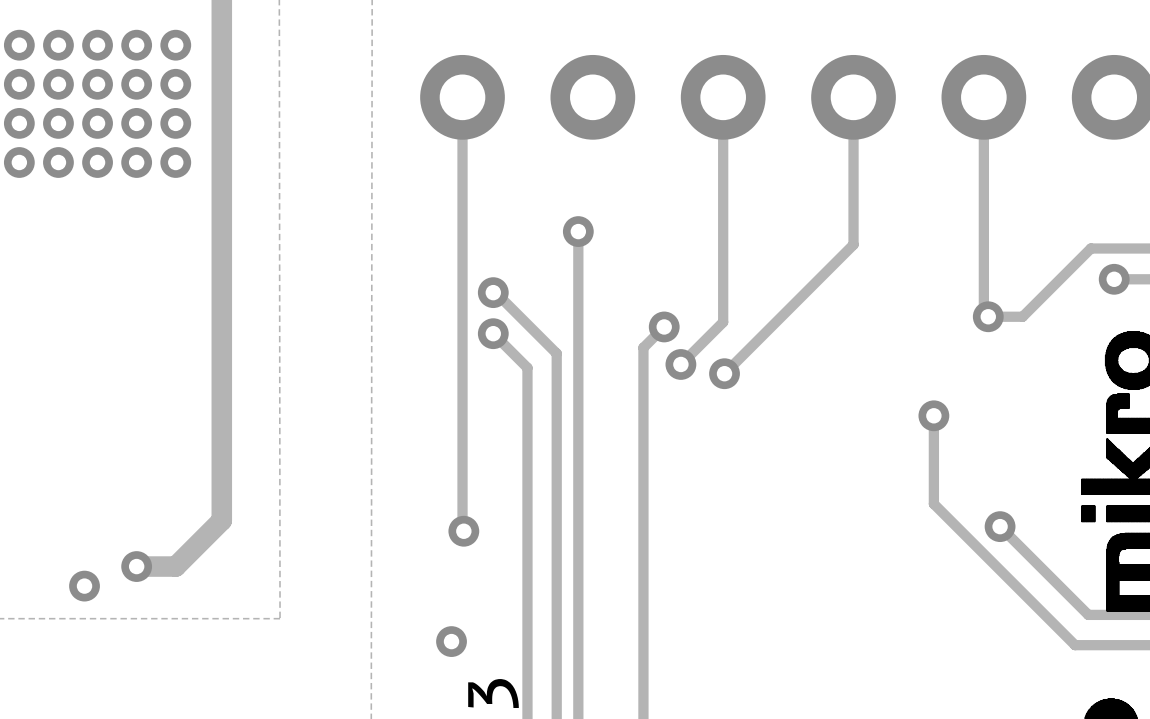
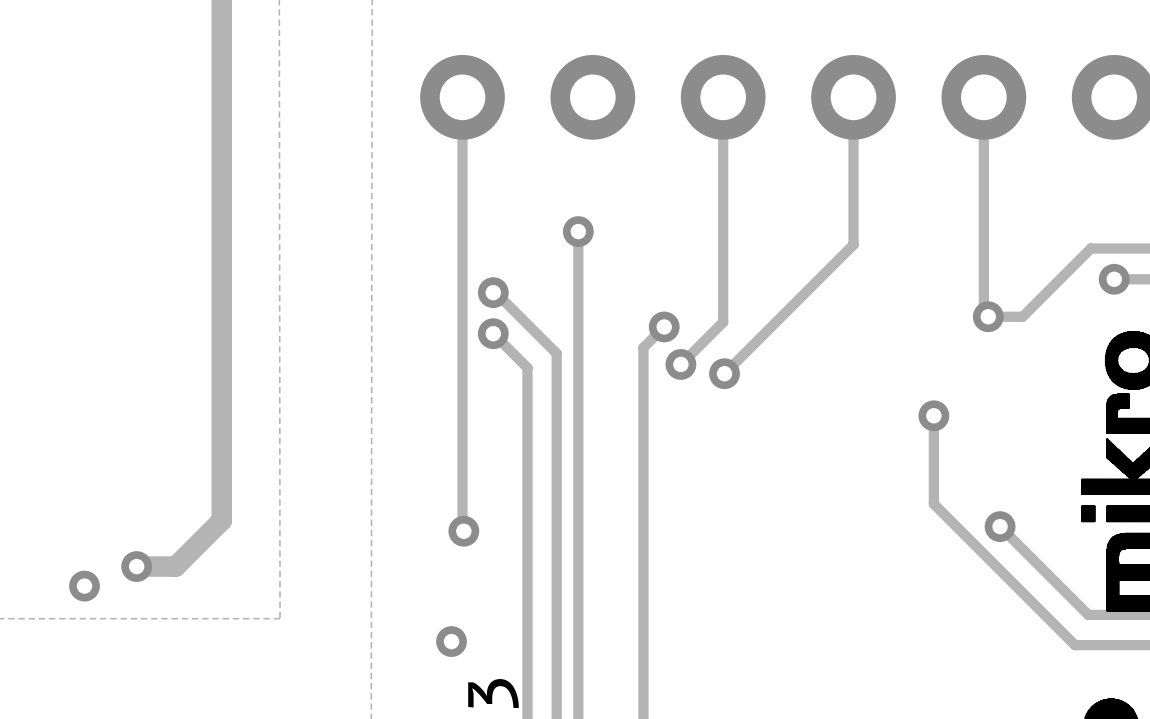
via: (19, 45) -> none
via: (58, 45) -> none
via: (97, 45) -> none
via: (136, 45) -> none
via: (175, 45) -> none
via: (19, 84) -> none
via: (58, 84) -> none
via: (97, 84) -> none
via: (136, 84) -> none
via: (175, 84) -> none
via: (19, 123) -> none
via: (58, 123) -> none
via: (97, 123) -> none
via: (136, 123) -> none
via: (175, 123) -> none
via: (19, 162) -> none
via: (58, 162) -> none
via: (97, 162) -> none
via: (136, 162) -> none
via: (175, 162) -> none

